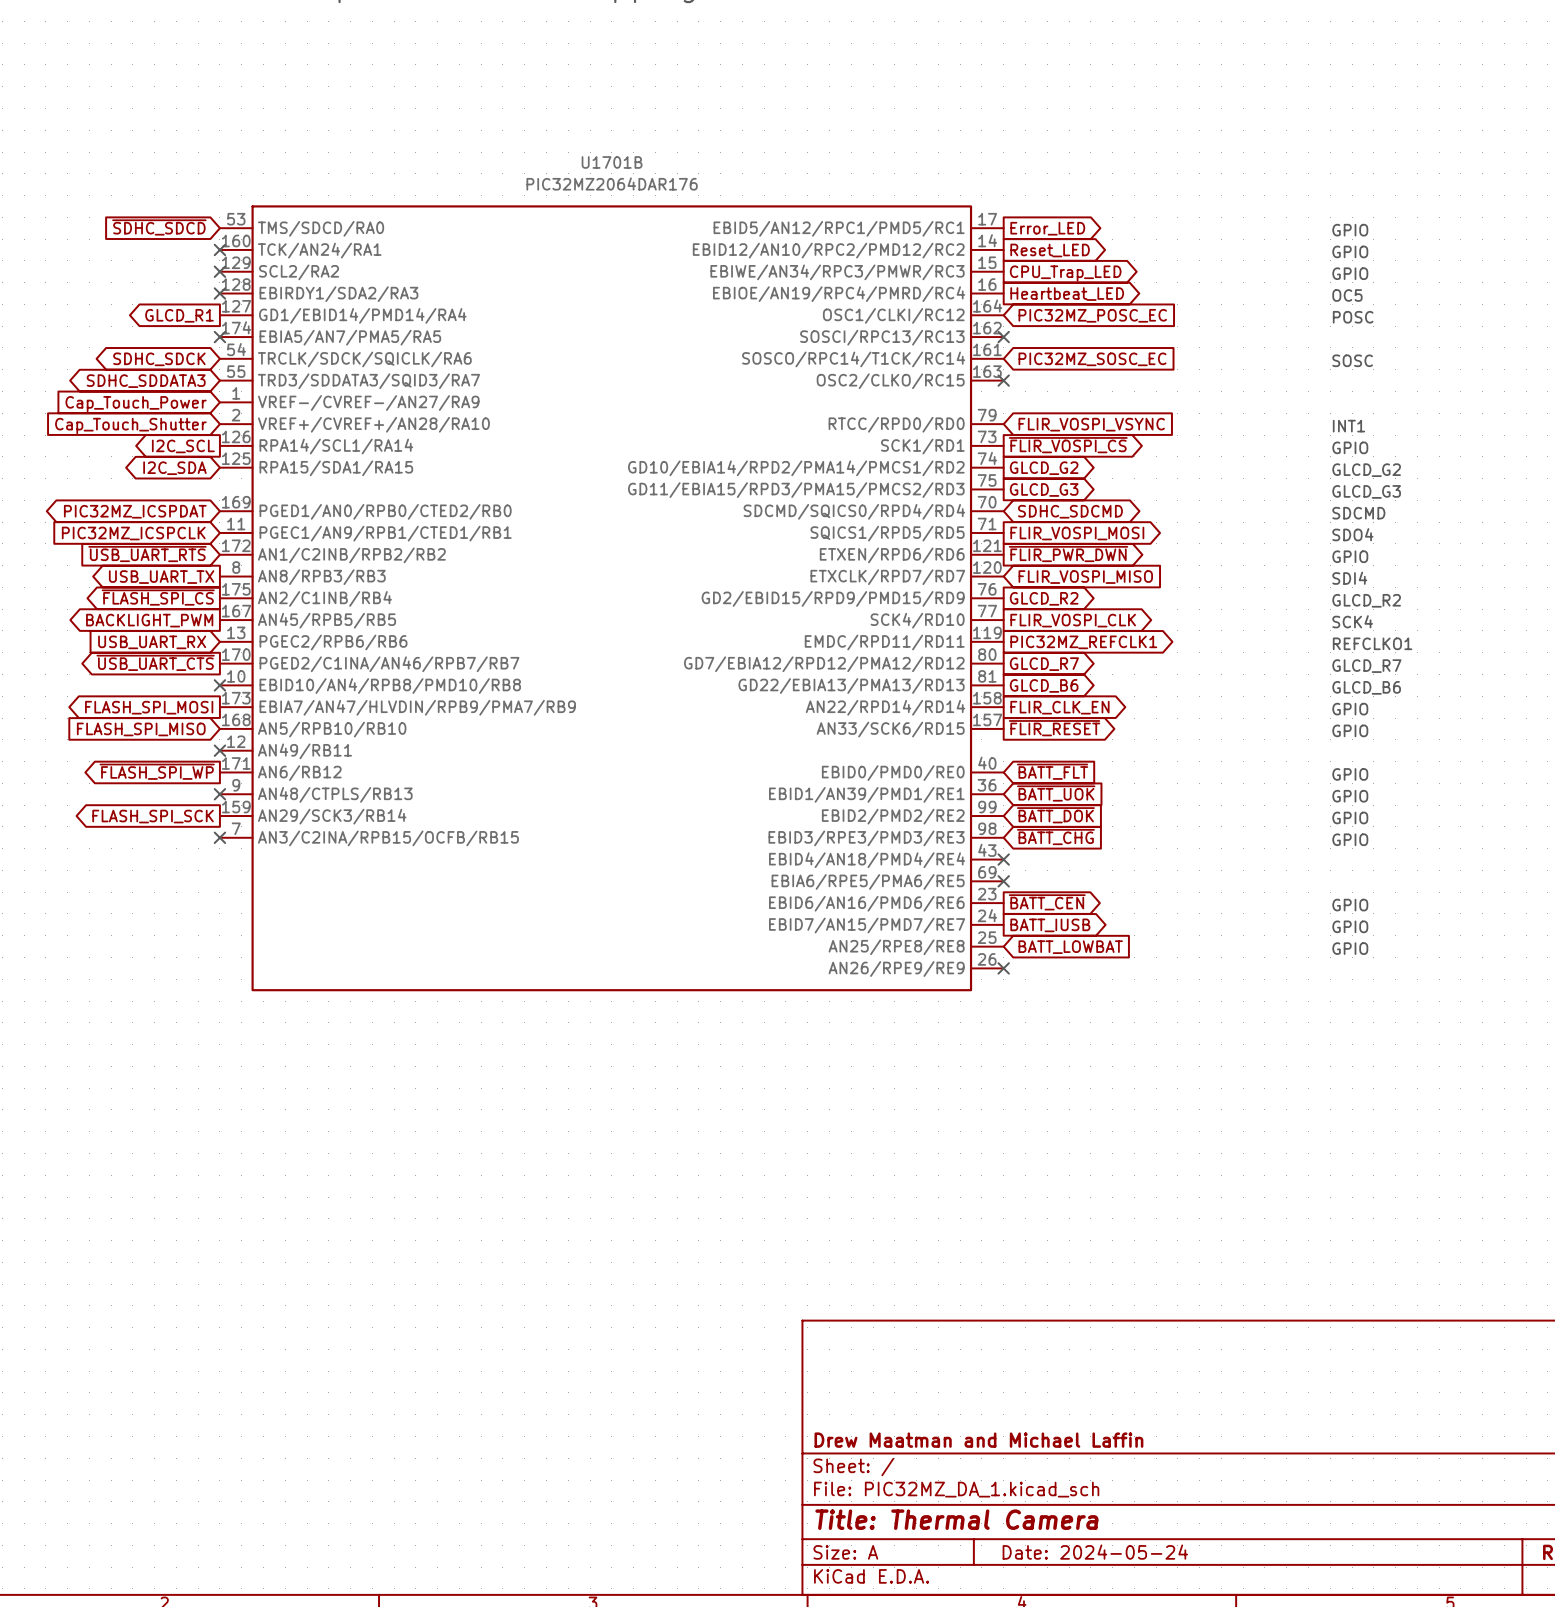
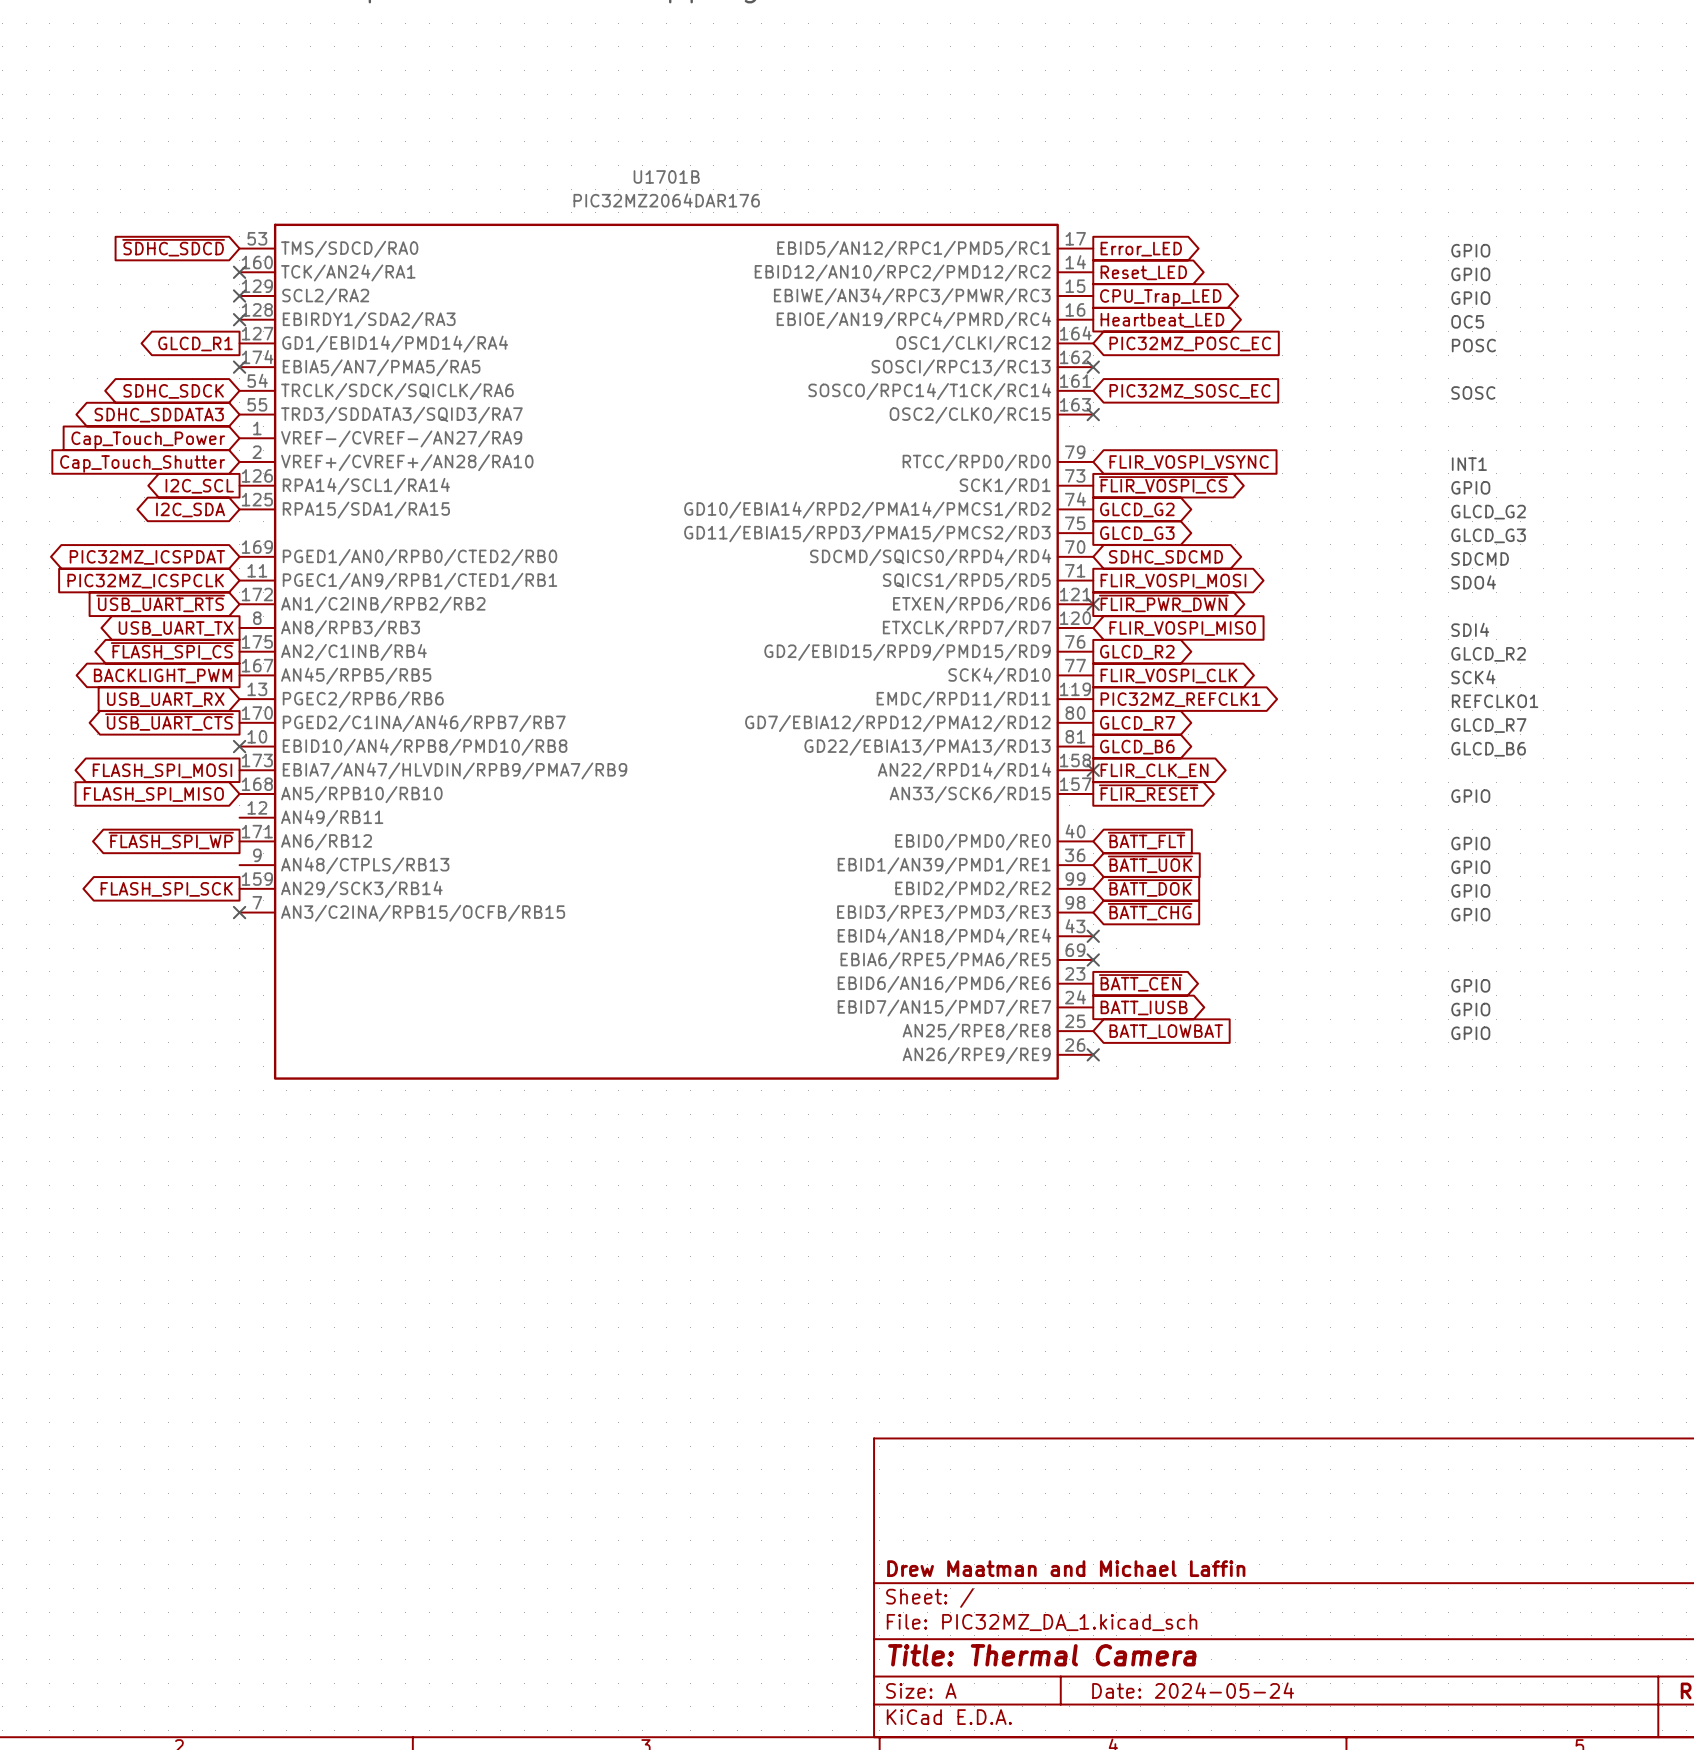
no-connect mark: none -> (1093, 604)
text: GPIO (1350, 556) -> none
no-connect mark: none -> (1093, 770)
text: GPIO (1350, 709) -> none
no-connect mark: (219, 750) -> none
no-connect mark: (219, 794) -> none

